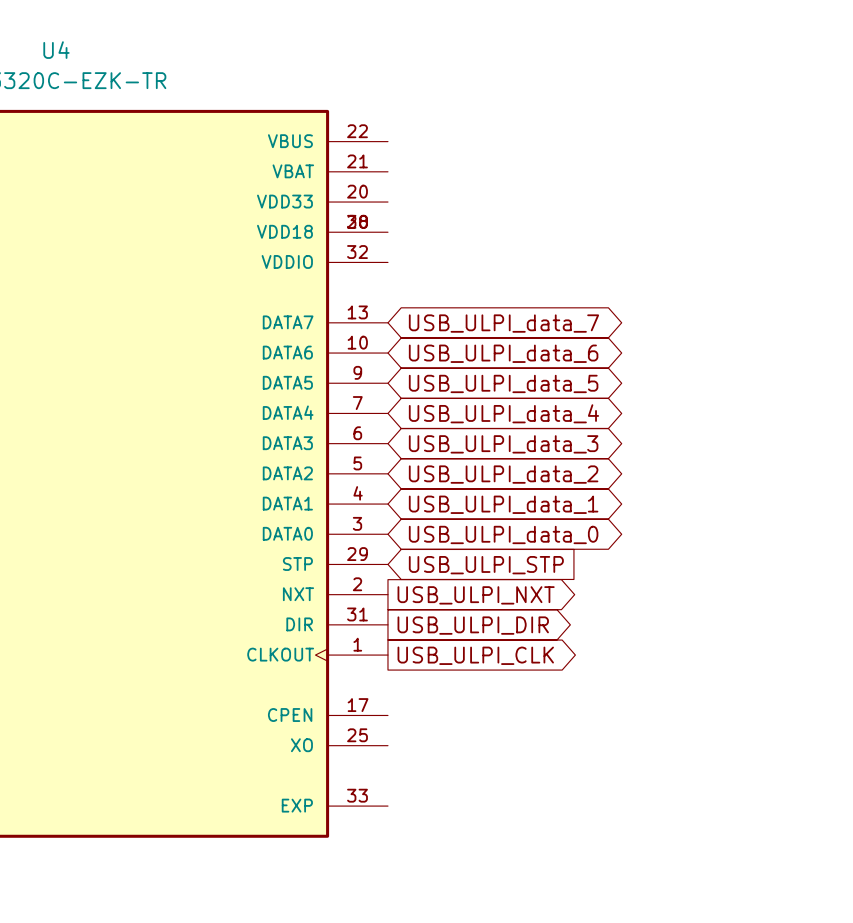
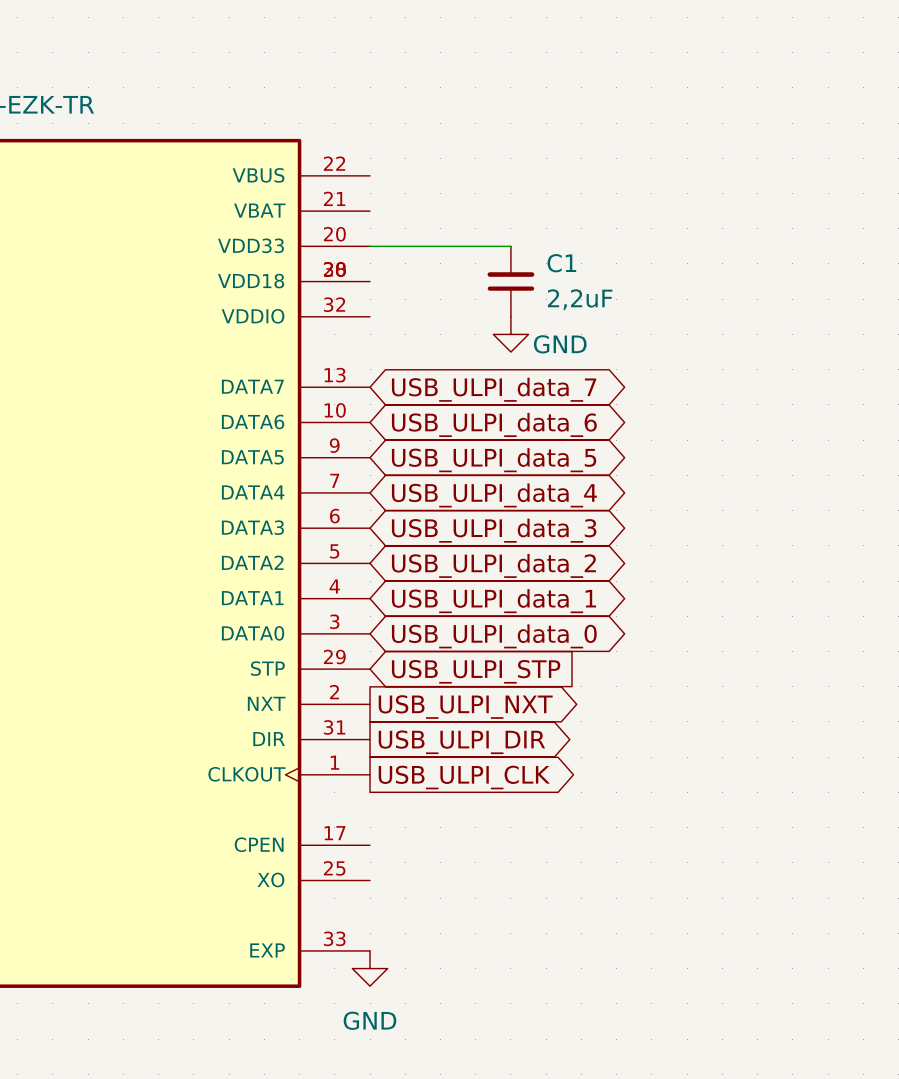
wire: none -> (370, 246) (510, 246)
C1: none -> 2,2uF (510, 281)
power symbol: none -> GND (510, 334)
power symbol: none -> GND (370, 968)

